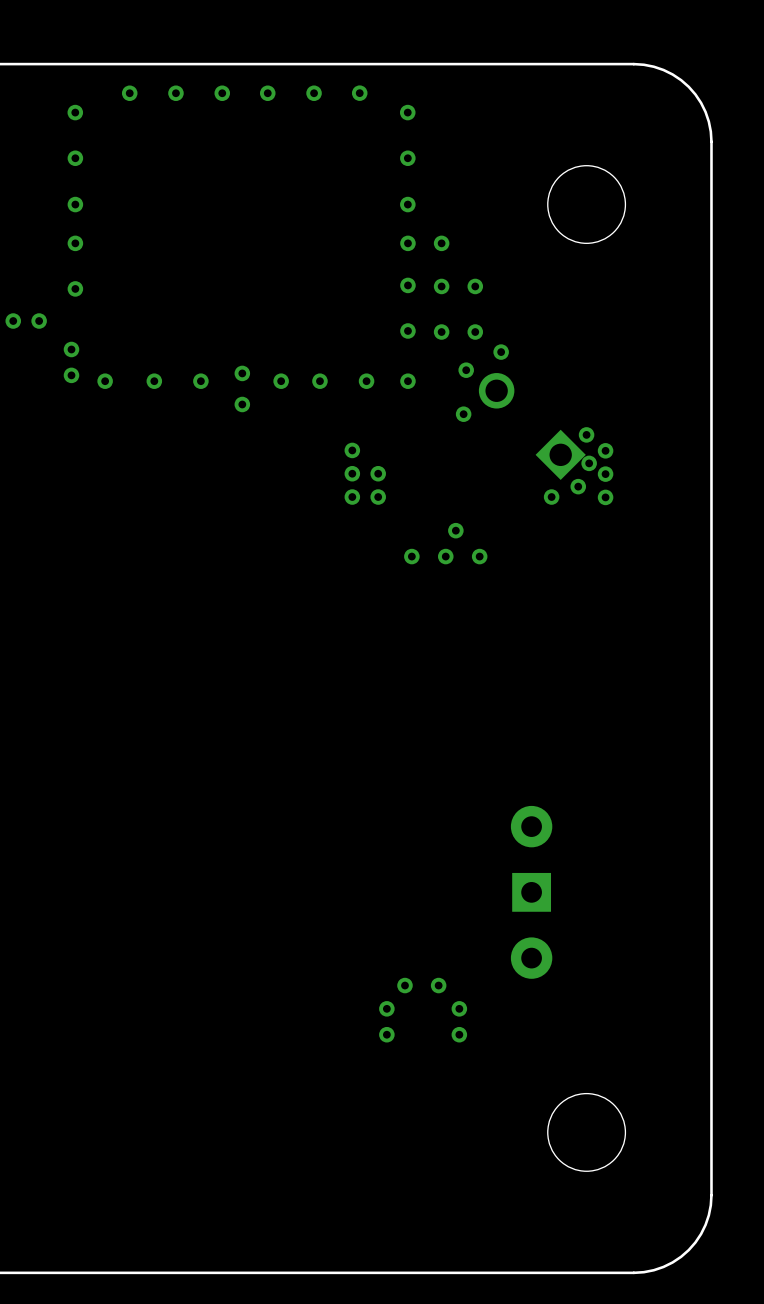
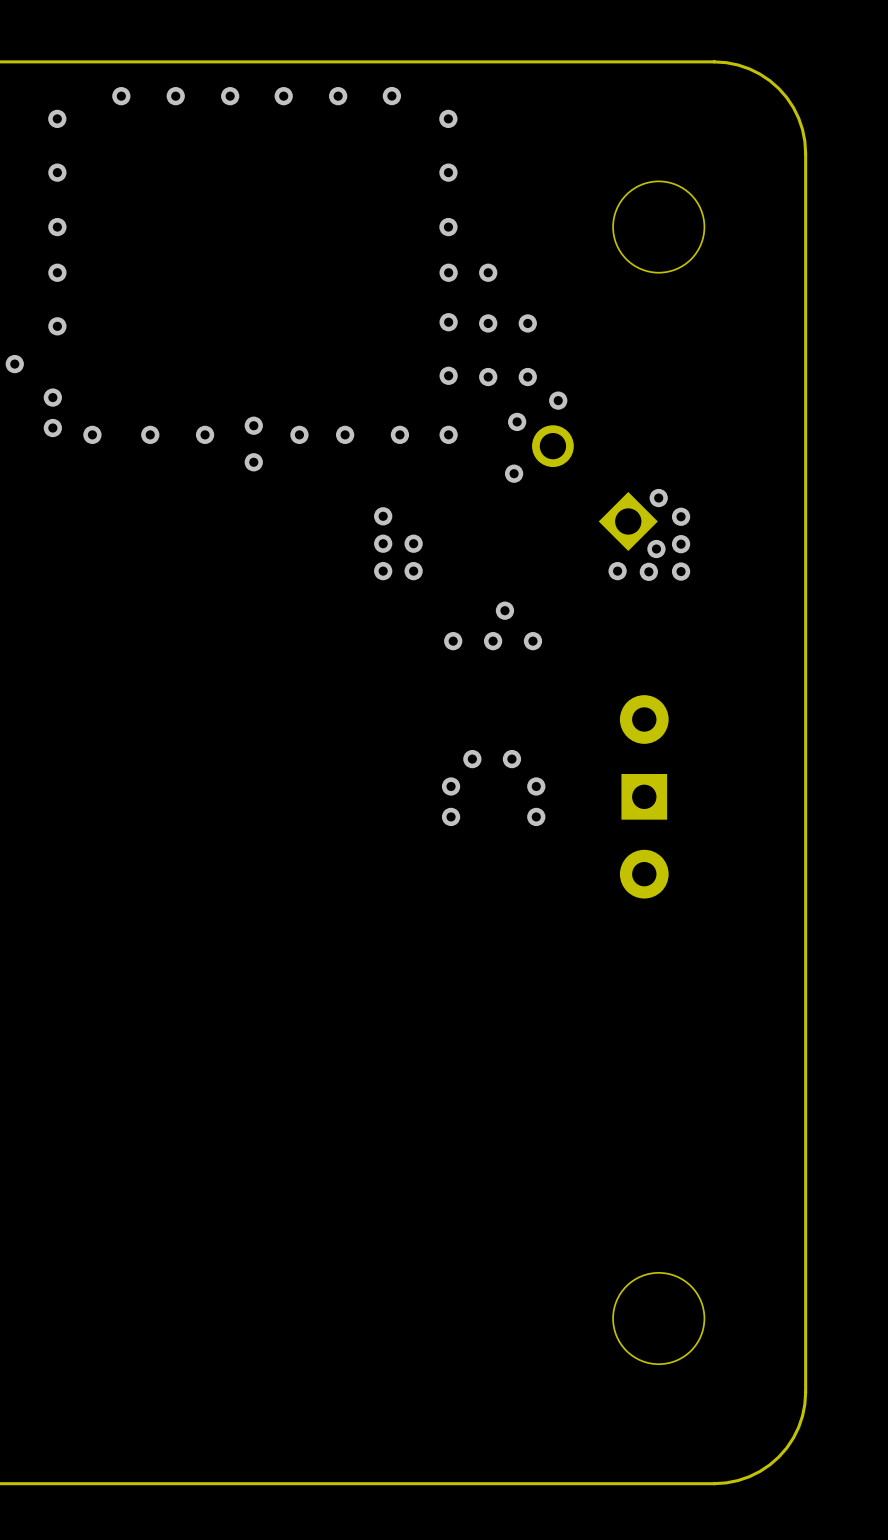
via: (589, 463) -> none
via: none -> (656, 549)
via: (578, 486) -> none
via: none -> (648, 571)
via: none -> (472, 759)
via: none -> (511, 759)
via: none -> (451, 786)
via: none -> (536, 786)
via: none -> (451, 816)
via: none -> (536, 816)
part position: (531, 892) -> (644, 796)
via: (404, 985) -> none
via: (438, 985) -> none
via: (386, 1008) -> none
via: (459, 1008) -> none
via: (386, 1034) -> none
via: (459, 1034) -> none

